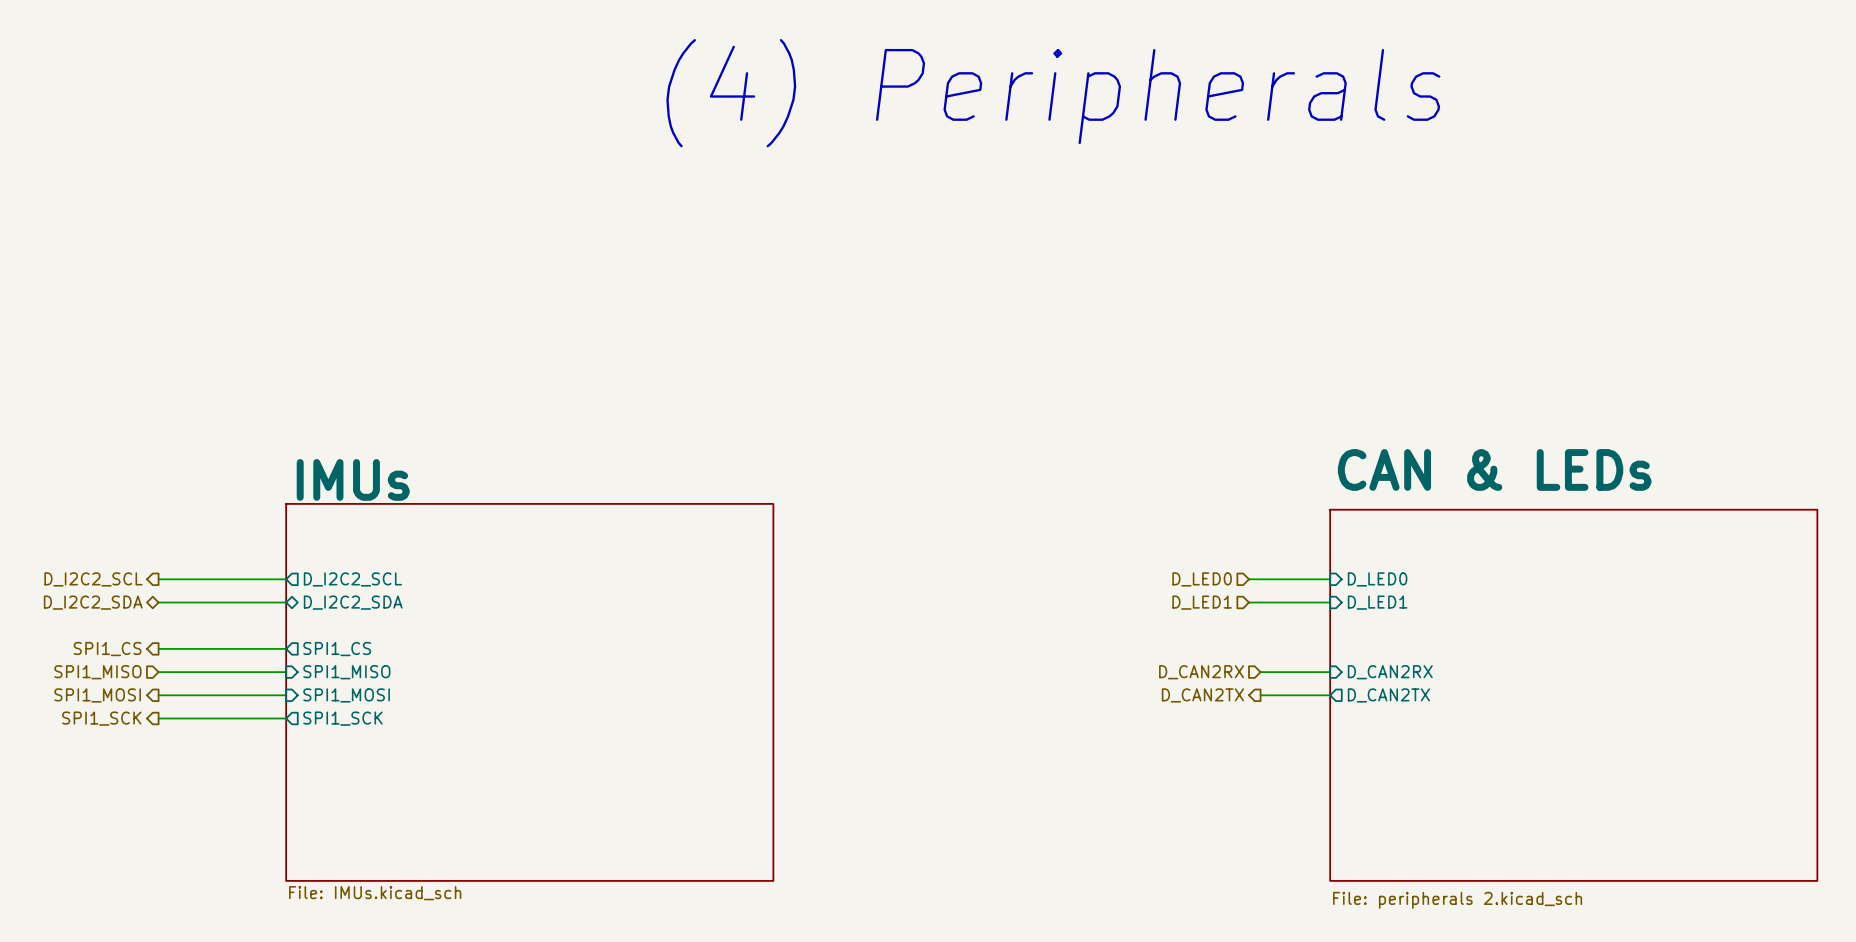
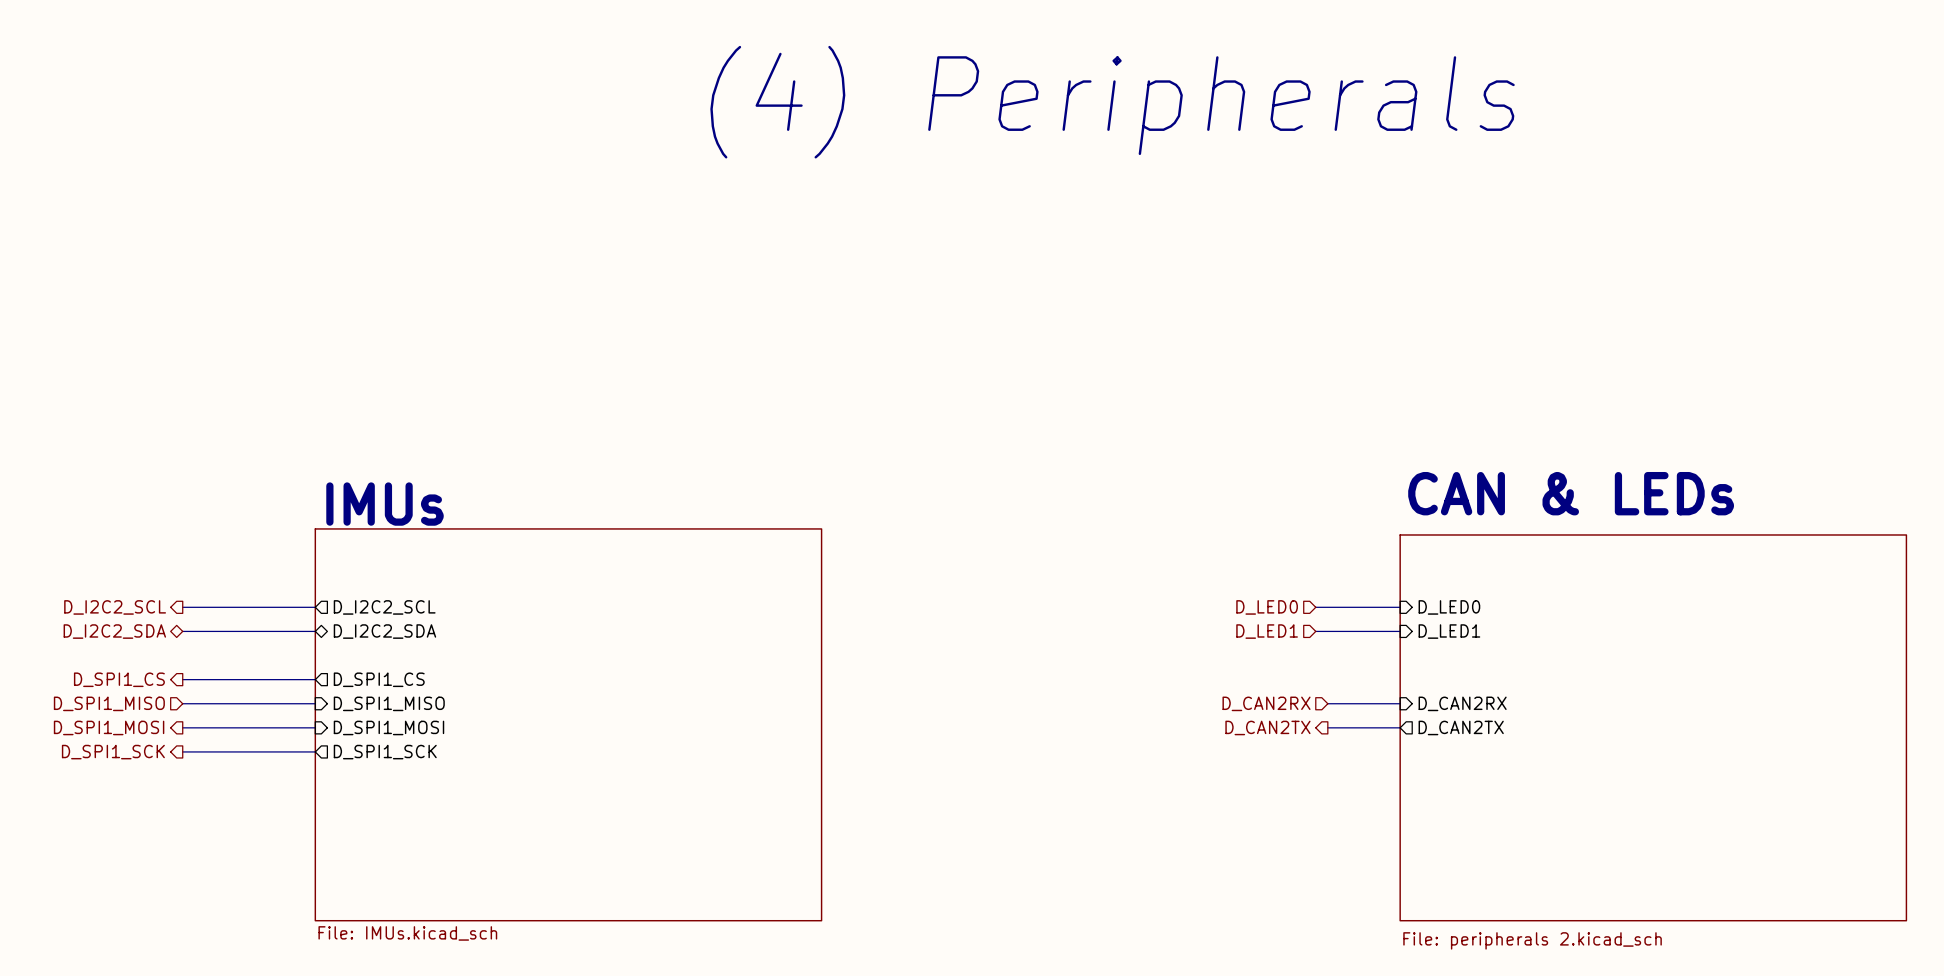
hierarchical label: SPI1_CS (107, 649) -> D_SPI1_CS (119, 679)
sheet pin: SPI1_CS (337, 649) -> D_SPI1_CS (379, 679)
hierarchical label: SPI1_MISO (97, 672) -> D_SPI1_MISO (109, 703)
sheet pin: SPI1_MISO (346, 672) -> D_SPI1_MISO (389, 703)
hierarchical label: SPI1_MOSI (97, 695) -> D_SPI1_MOSI (109, 727)
sheet pin: SPI1_MOSI (346, 695) -> D_SPI1_MOSI (388, 727)
hierarchical label: SPI1_SCK (101, 718) -> D_SPI1_SCK (113, 752)
sheet pin: SPI1_SCK (342, 718) -> D_SPI1_SCK (385, 752)

